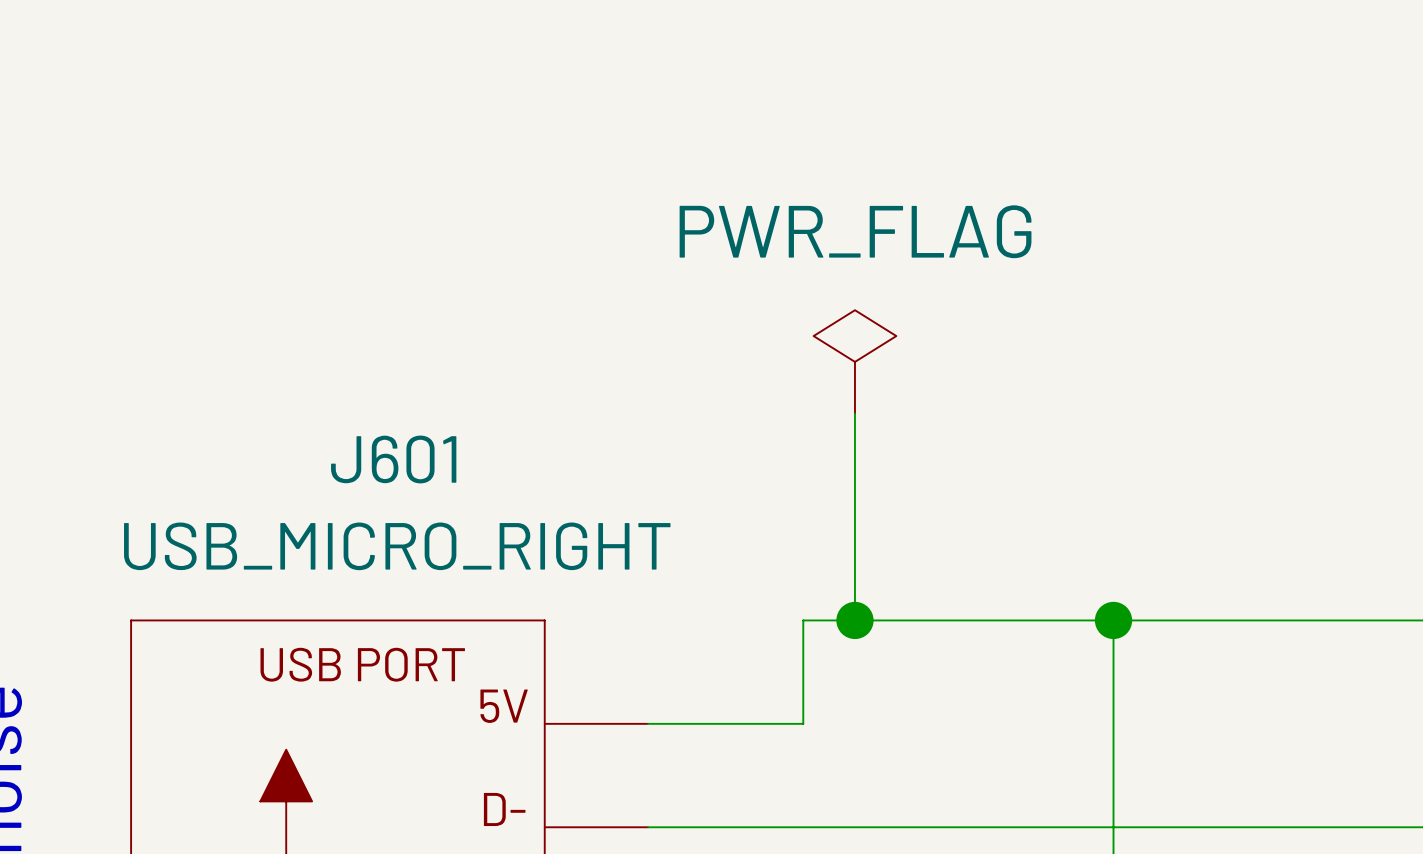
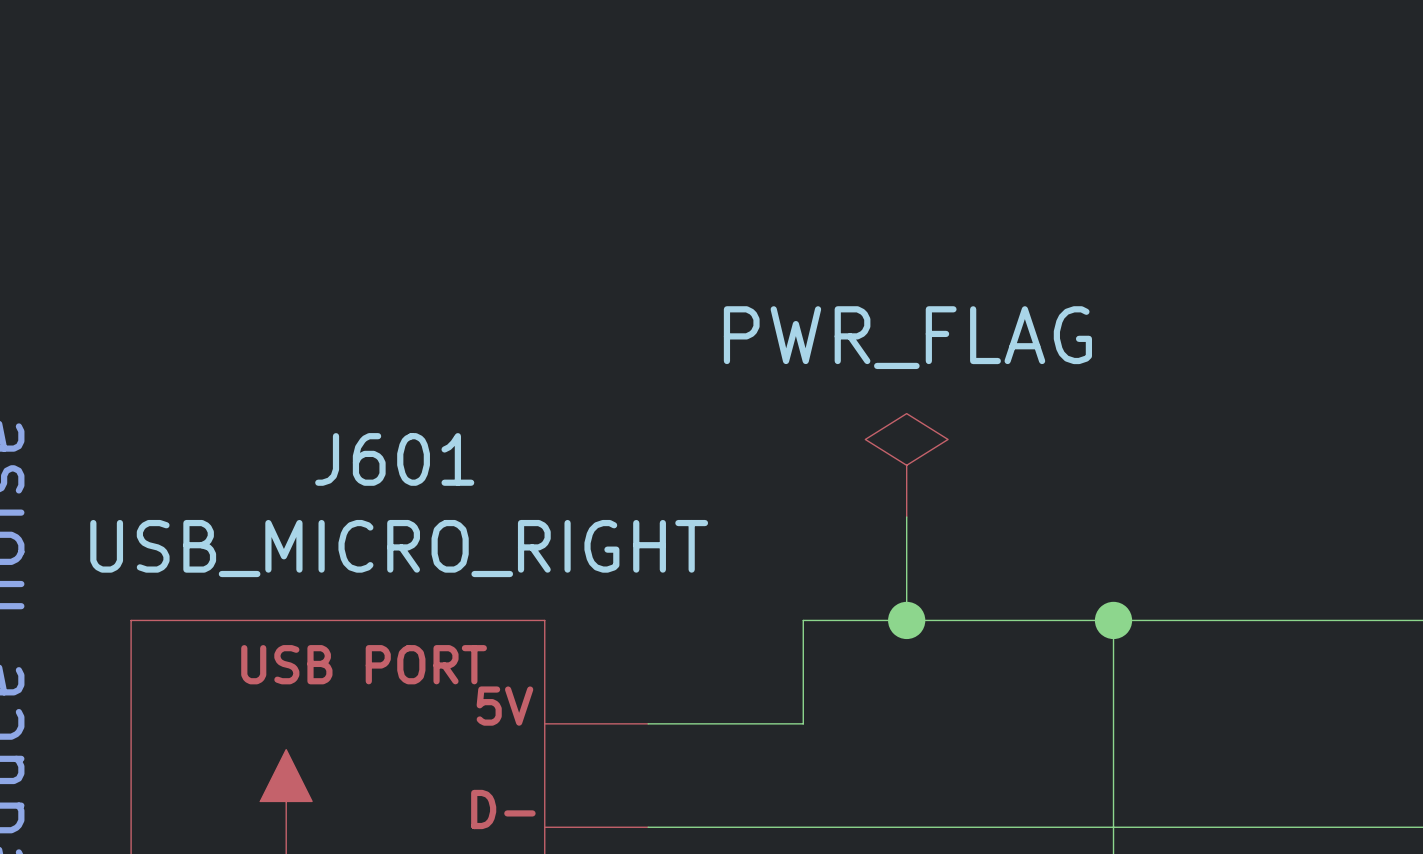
power symbol position: PWR_FLAG (854, 361) -> PWR_FLAG (906, 465)
wire: (854, 413) (854, 620) -> none
wire: none -> (906, 517) (906, 620)
junction position: (854, 620) -> (906, 620)

